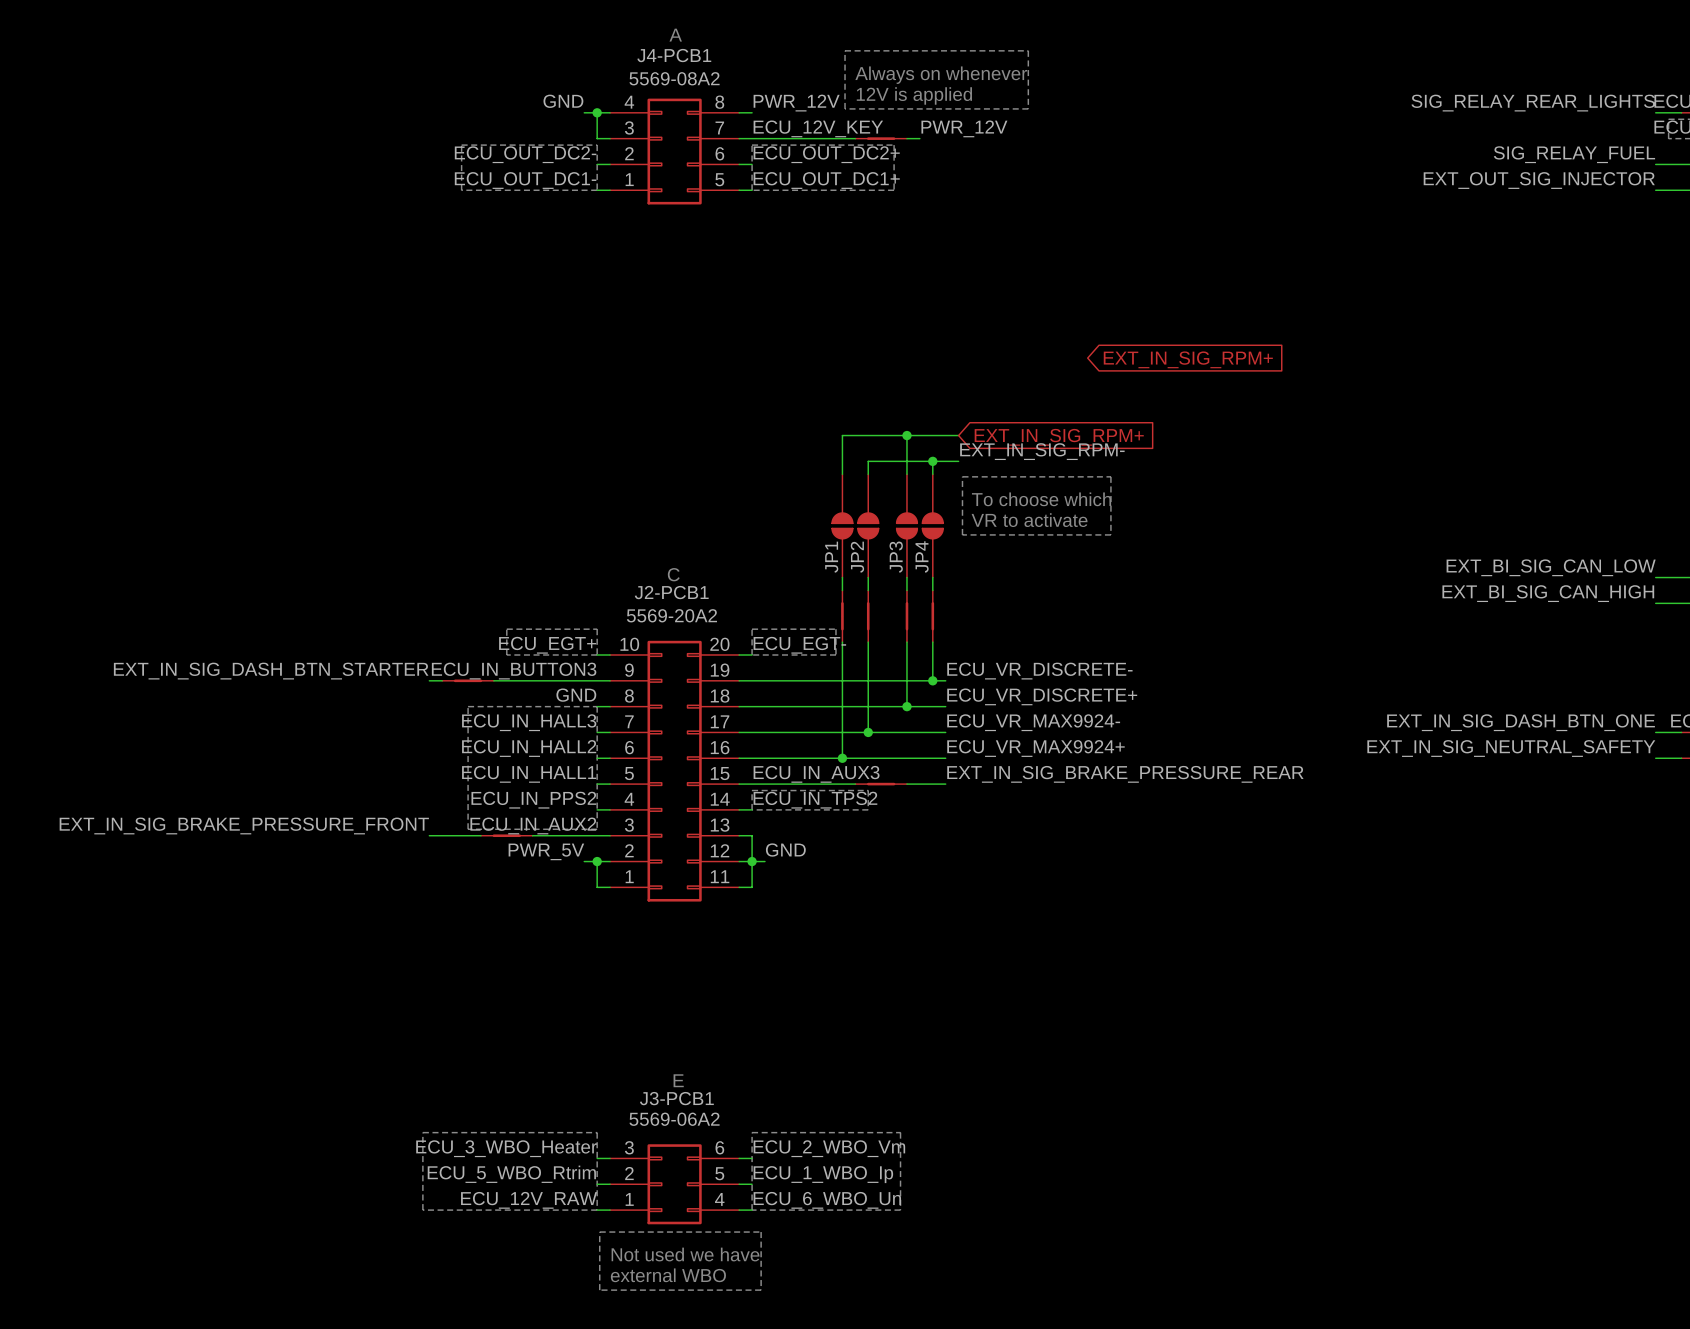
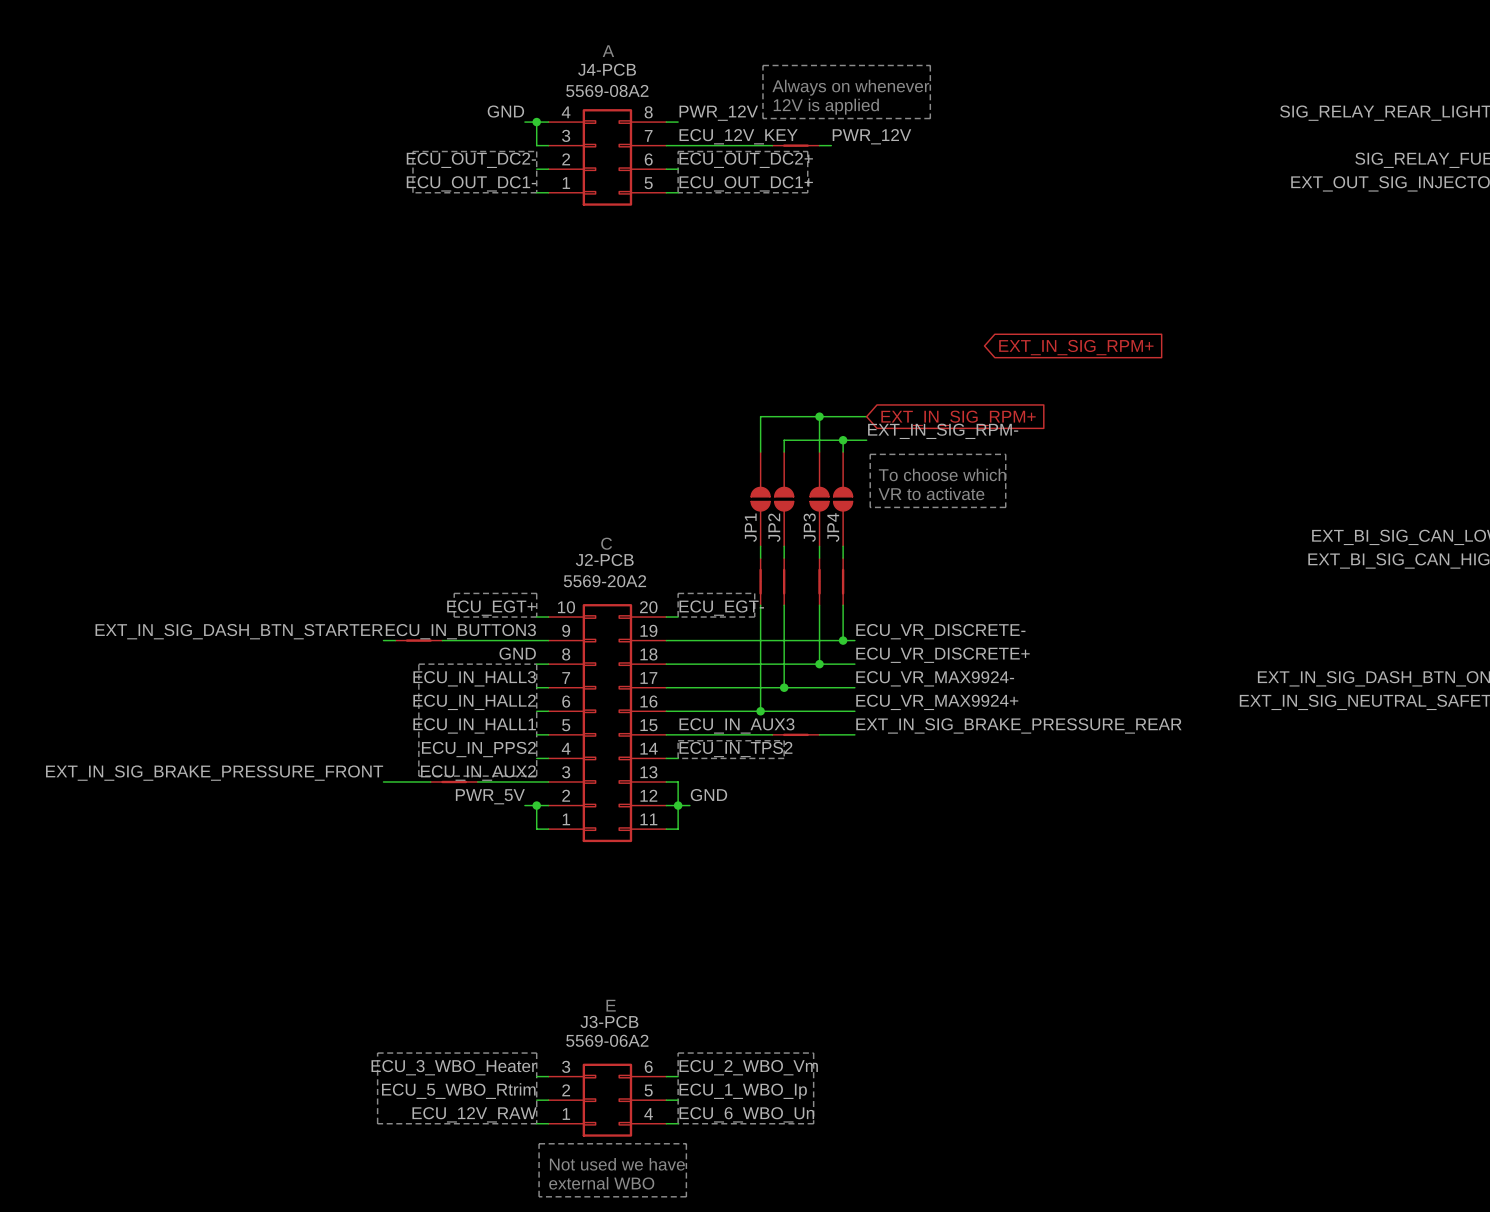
J4-PCB1 name: J4-PCB1 (674, 55) -> J4-PCB (607, 69)
J2-PCB1 name: J2-PCB1 (671, 592) -> J2-PCB (604, 560)
J3-PCB1 name: J3-PCB1 (676, 1098) -> J3-PCB (609, 1021)

